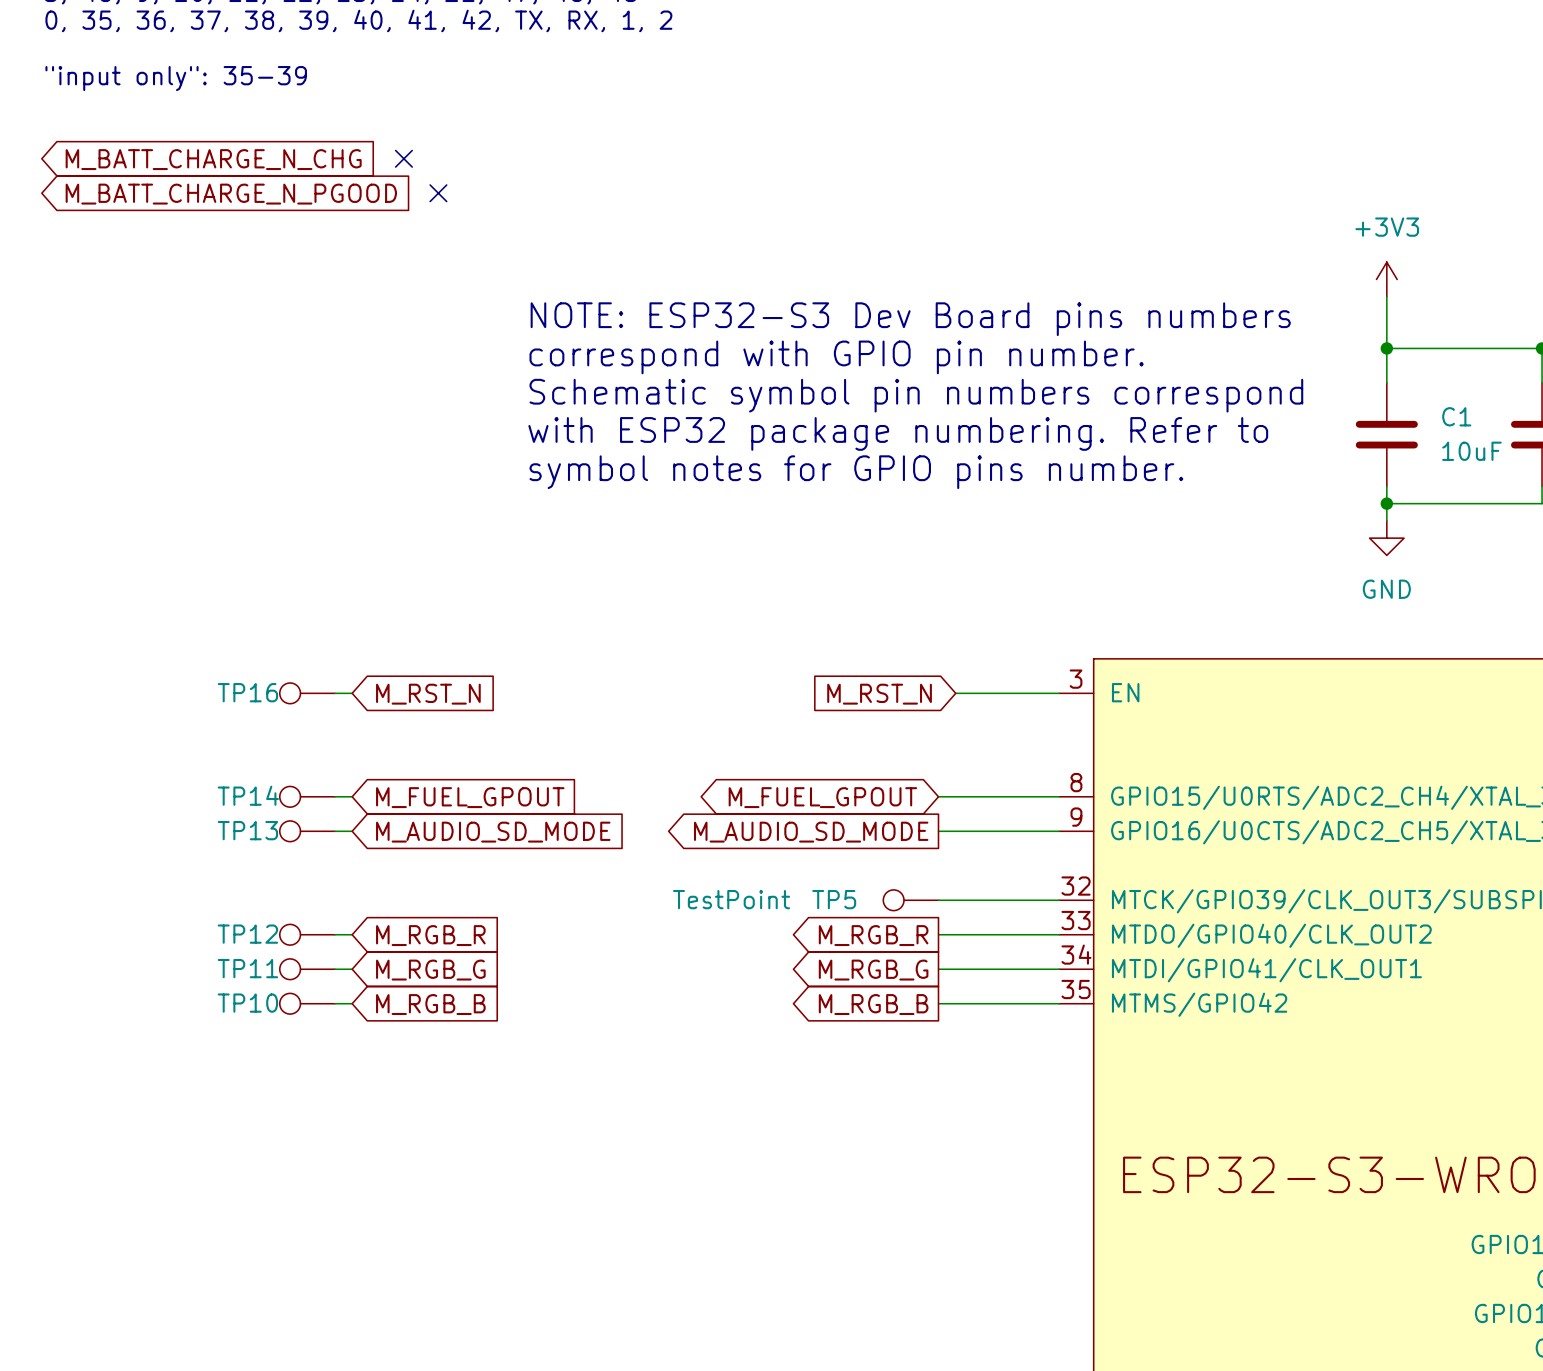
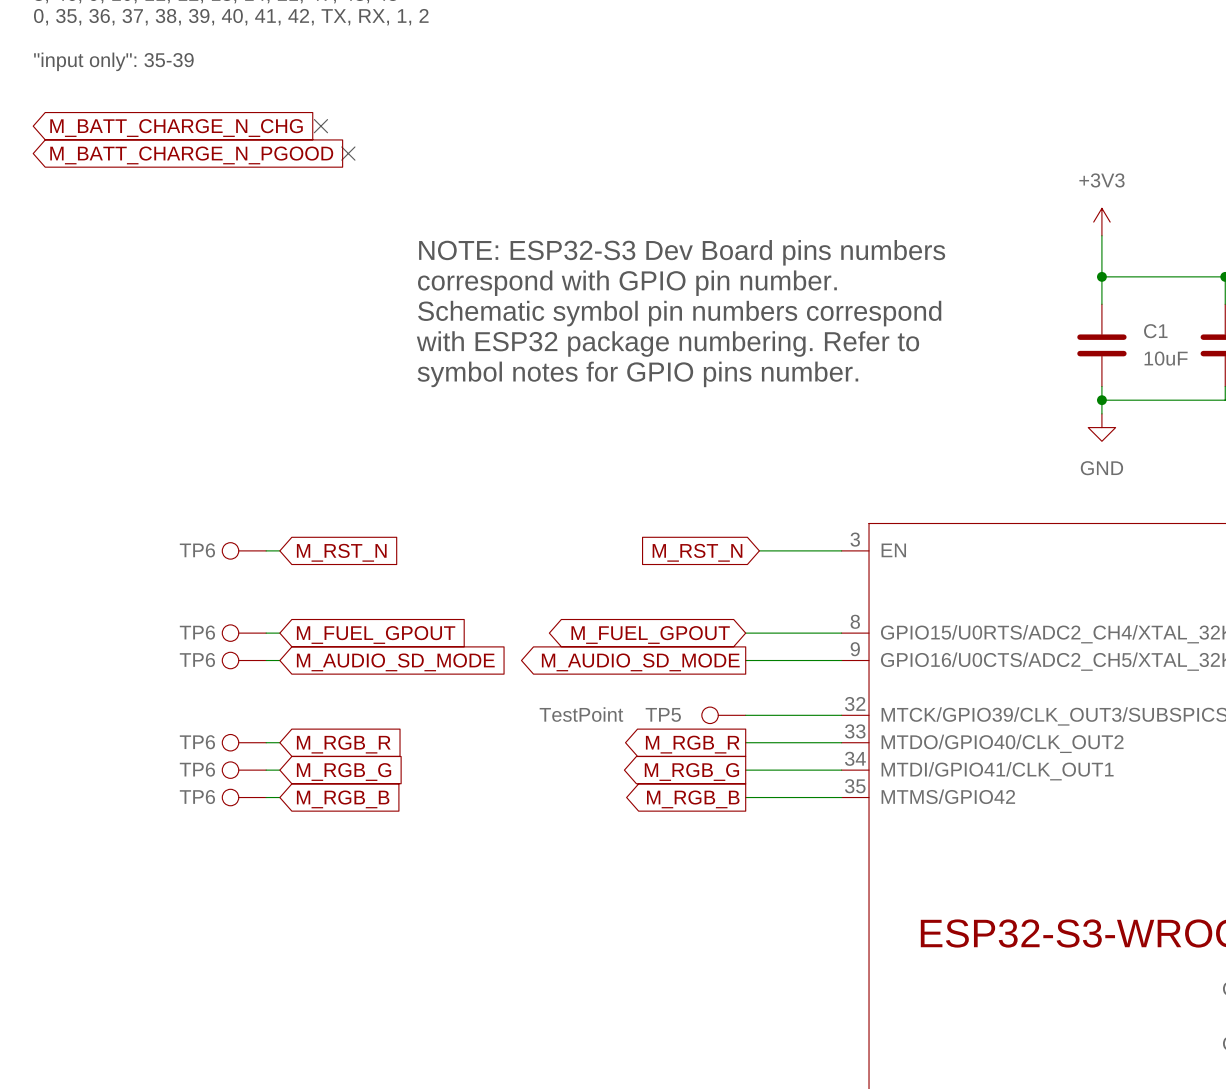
TP16 name: TP16 (247, 692) -> TP6 (197, 550)
TP14 name: TP14 (248, 795) -> TP6 (197, 632)
TP13 name: TP13 (247, 830) -> TP6 (197, 660)
TP12 name: TP12 (247, 934) -> TP6 (197, 742)
TP11 name: TP11 (247, 968) -> TP6 (197, 769)
TP10 name: TP10 (247, 1003) -> TP6 (197, 797)

